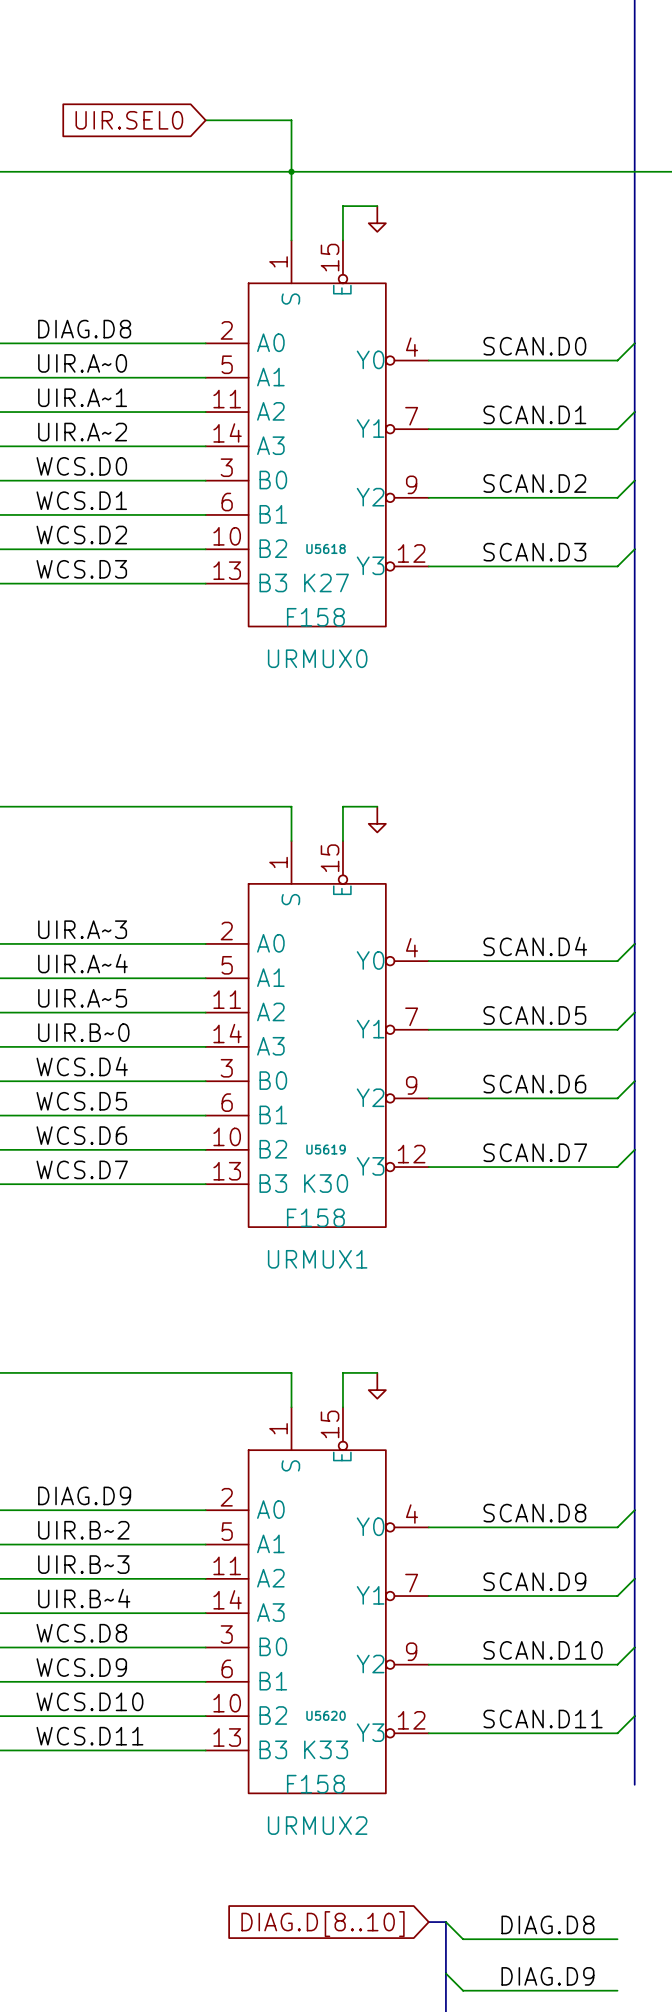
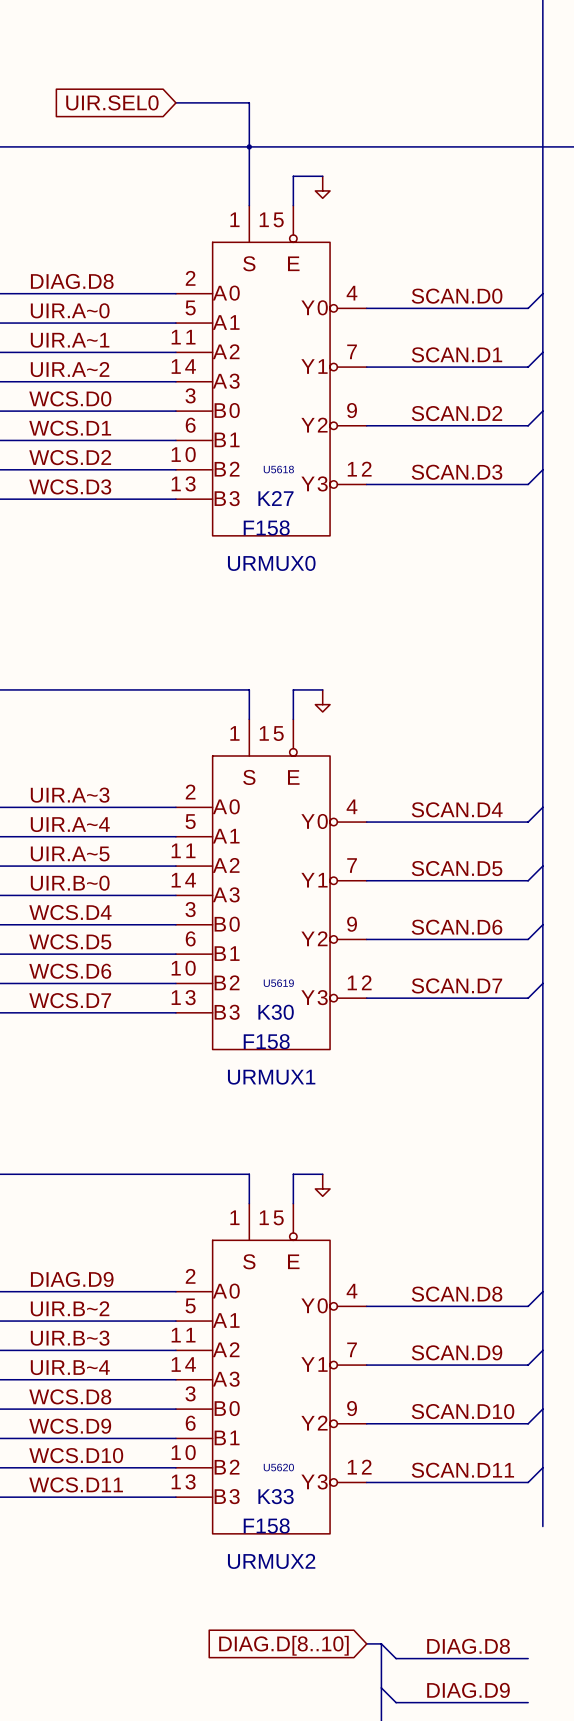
U5618 symbol: [205, 240, 429, 627] -> [175, 205, 367, 536]
U5619 symbol: [205, 841, 429, 1228] -> [175, 719, 367, 1050]
U5620 symbol: [205, 1407, 429, 1794] -> [175, 1203, 367, 1534]

